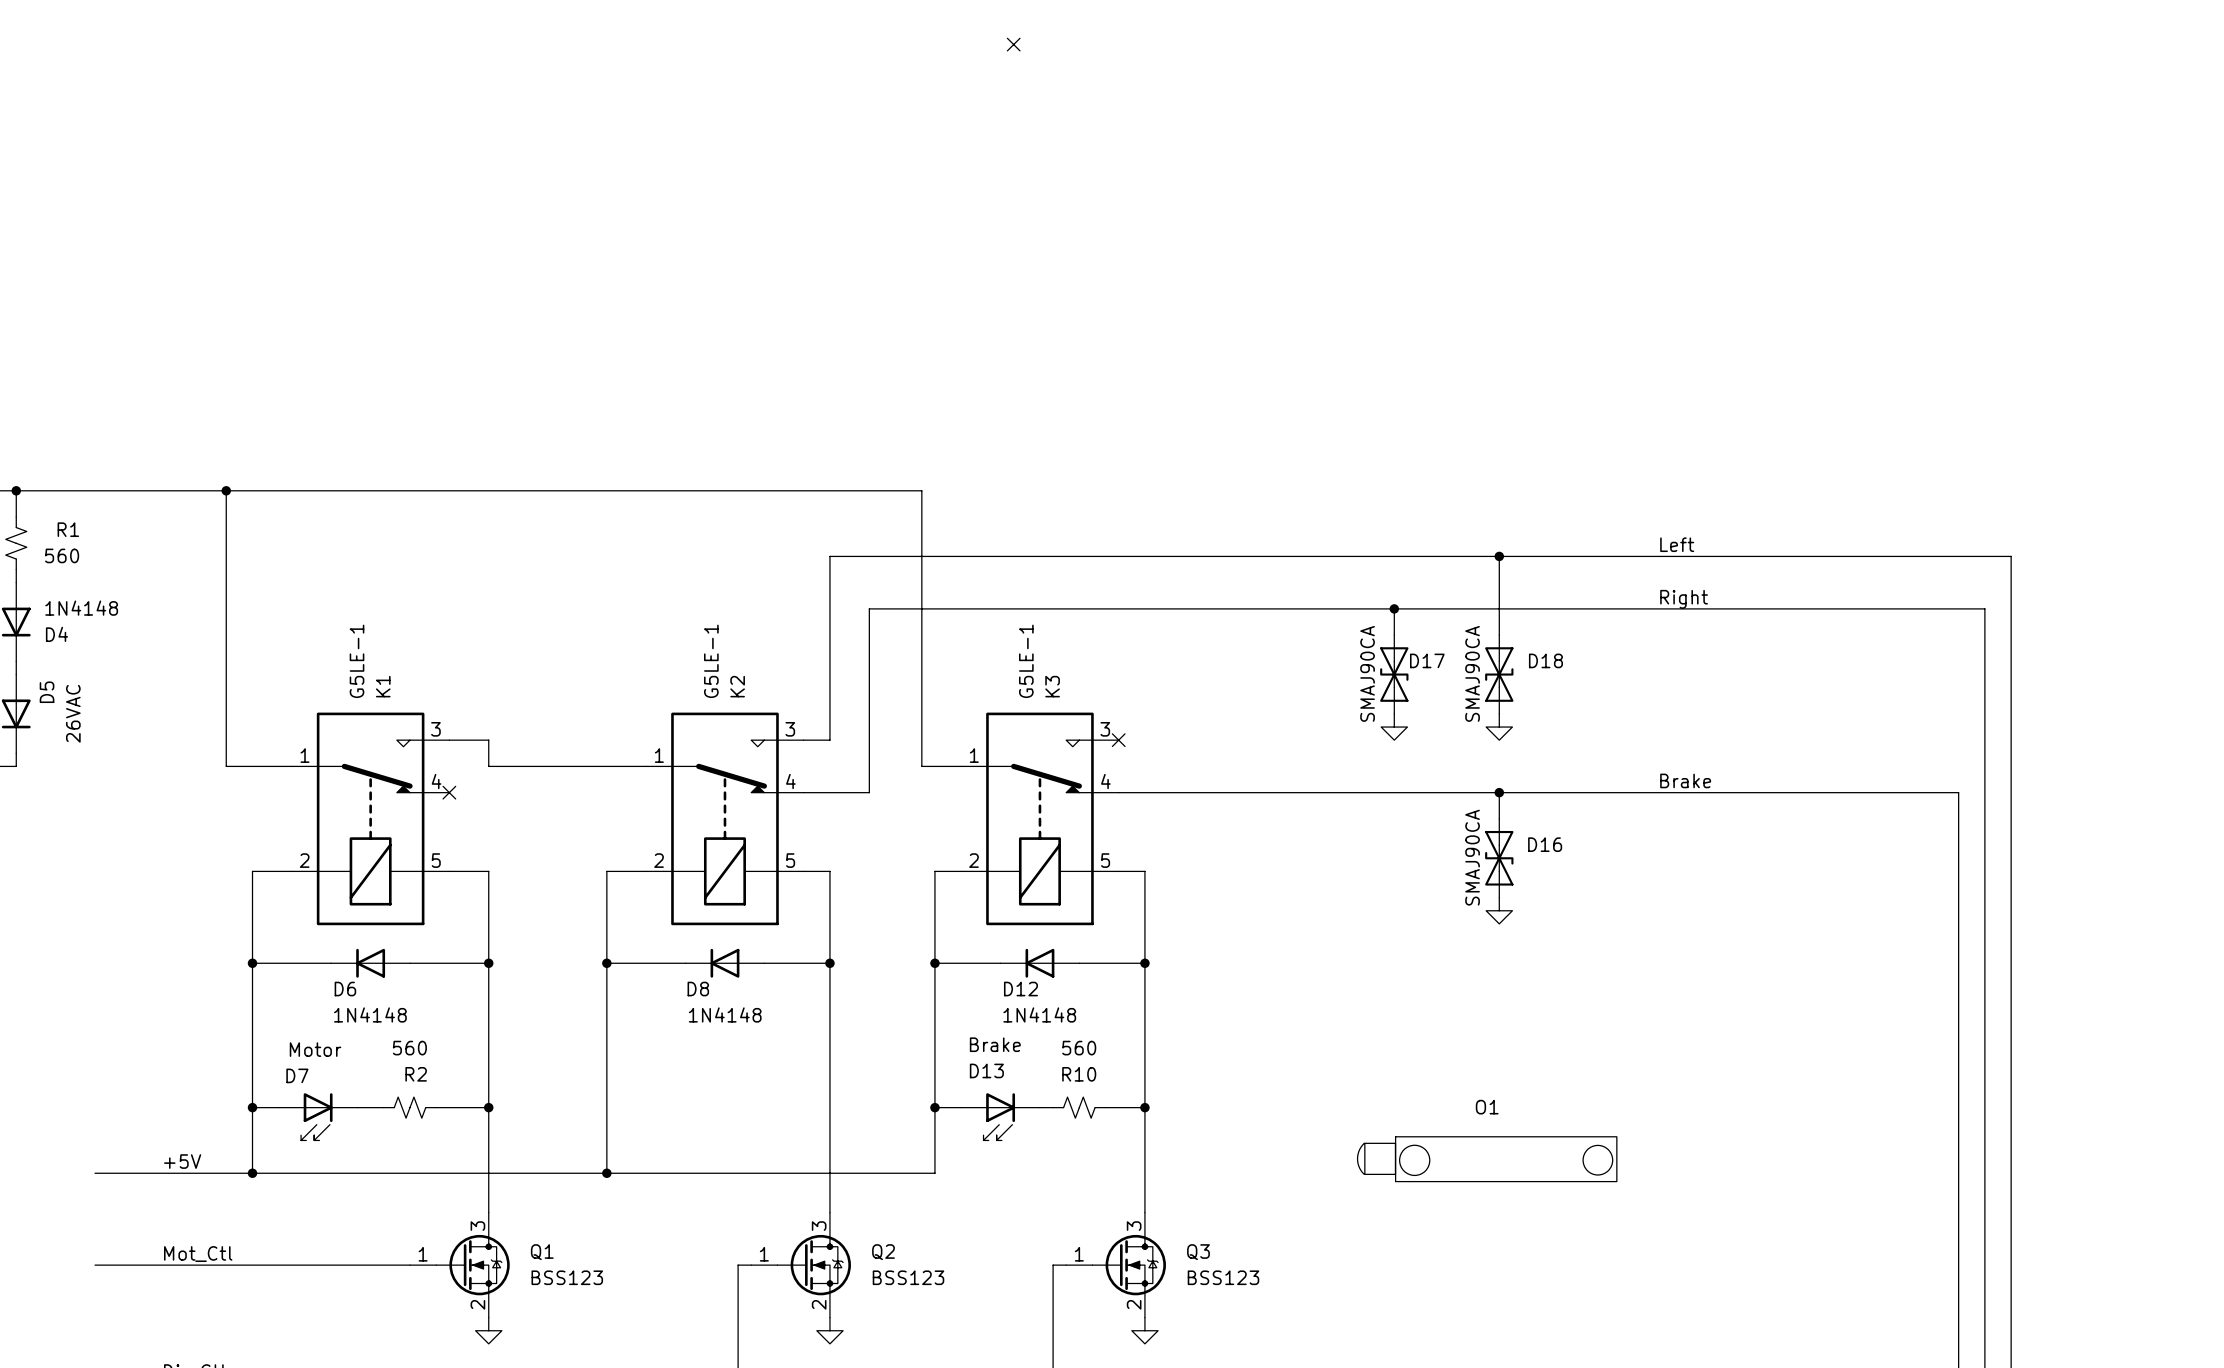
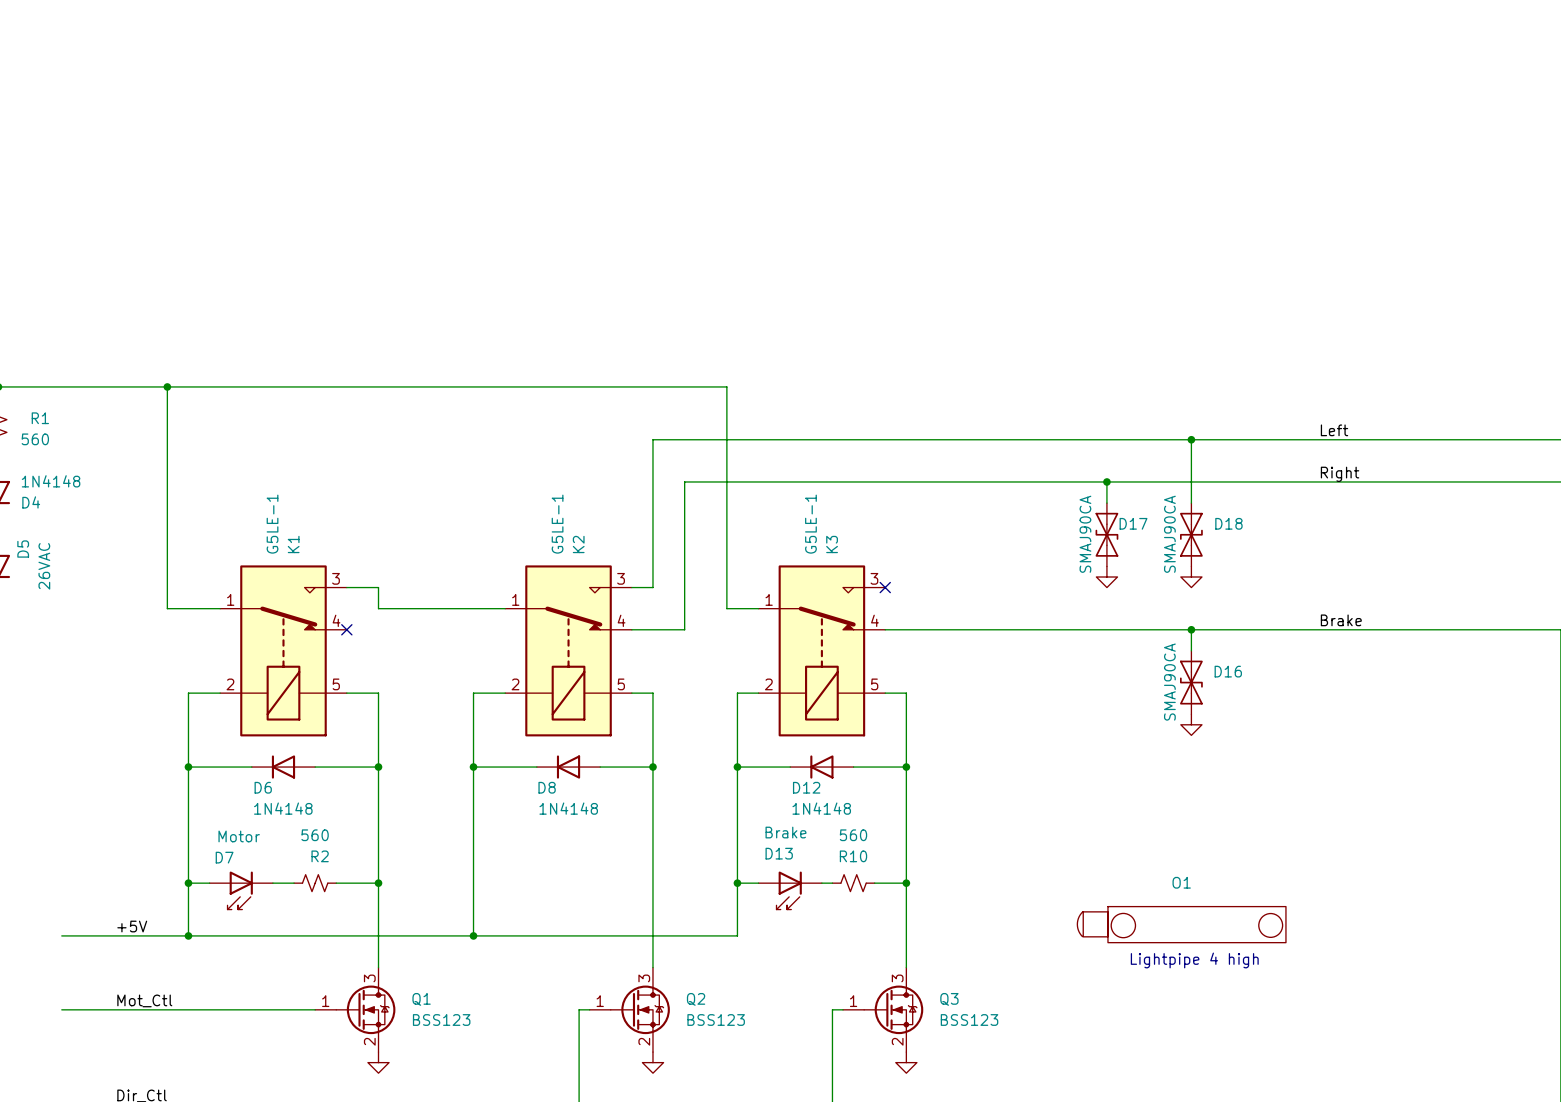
no-connect mark: (1013, 44) -> none
text: none -> Lightpipe 4 high (1194, 960)

